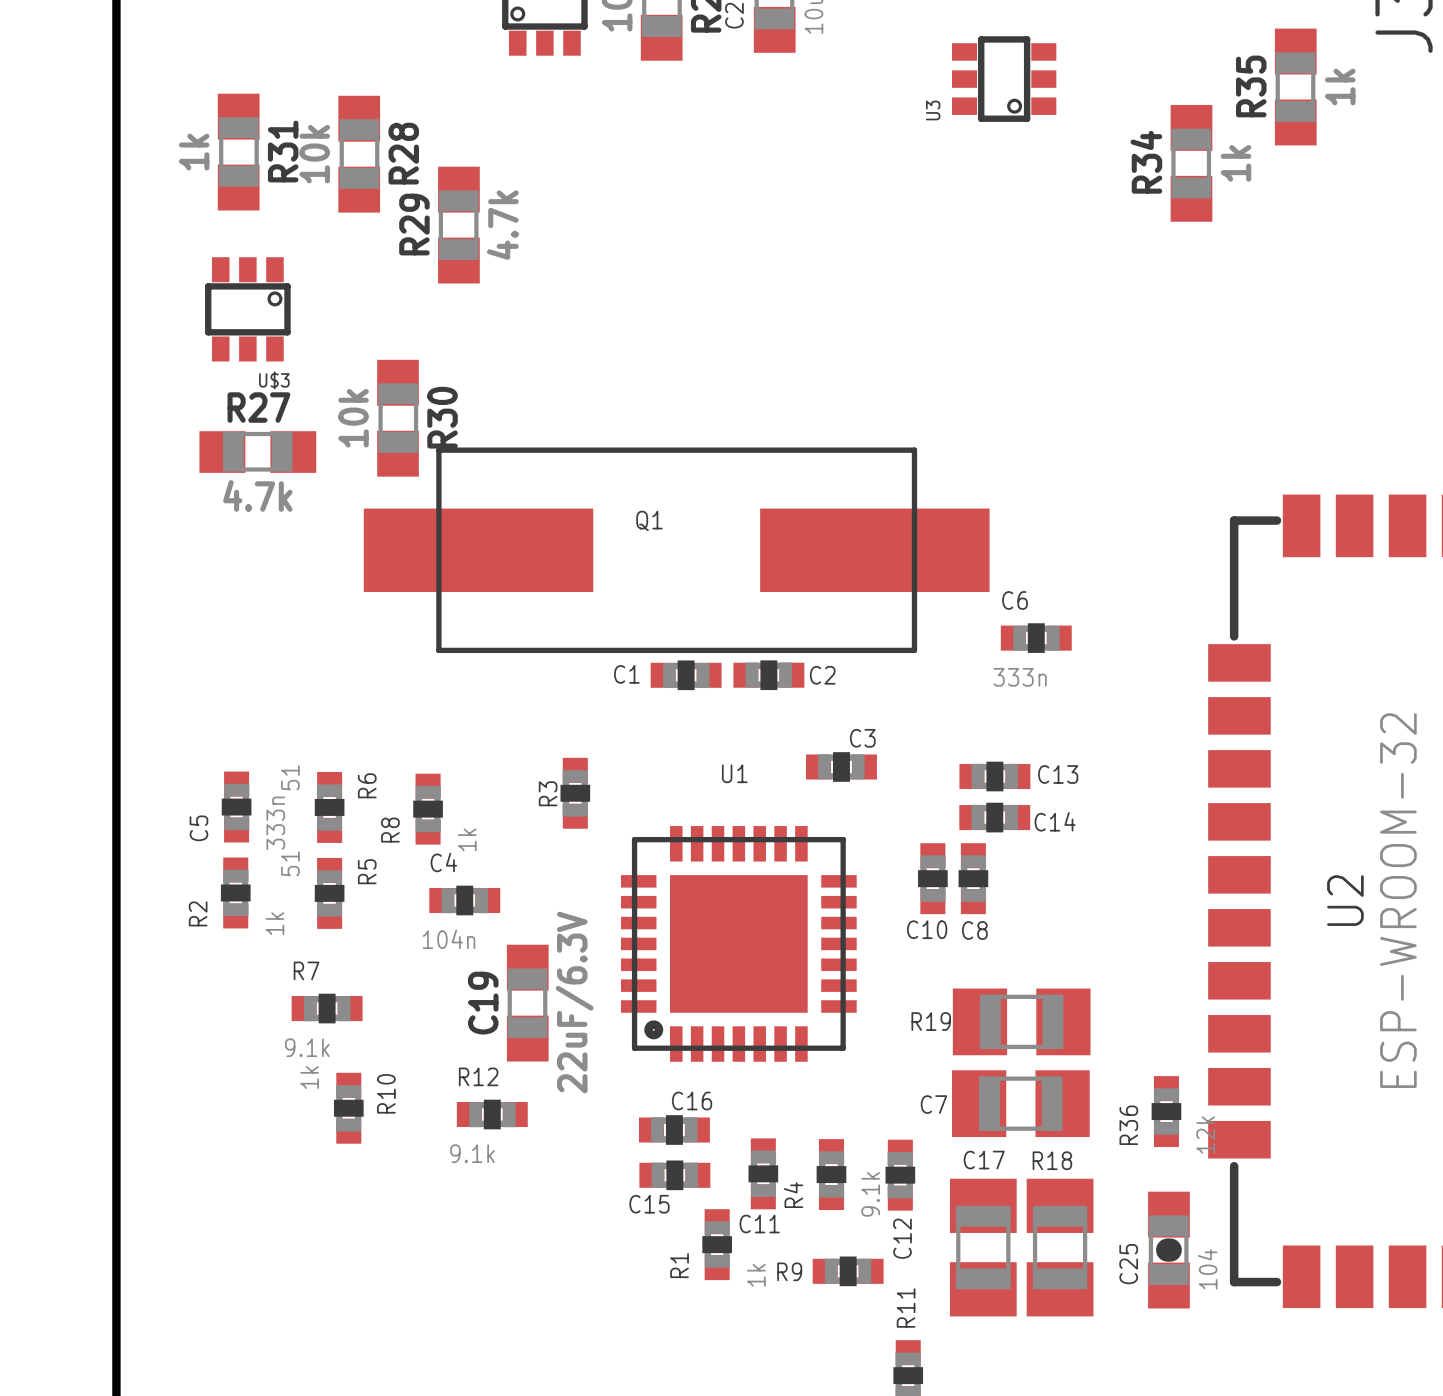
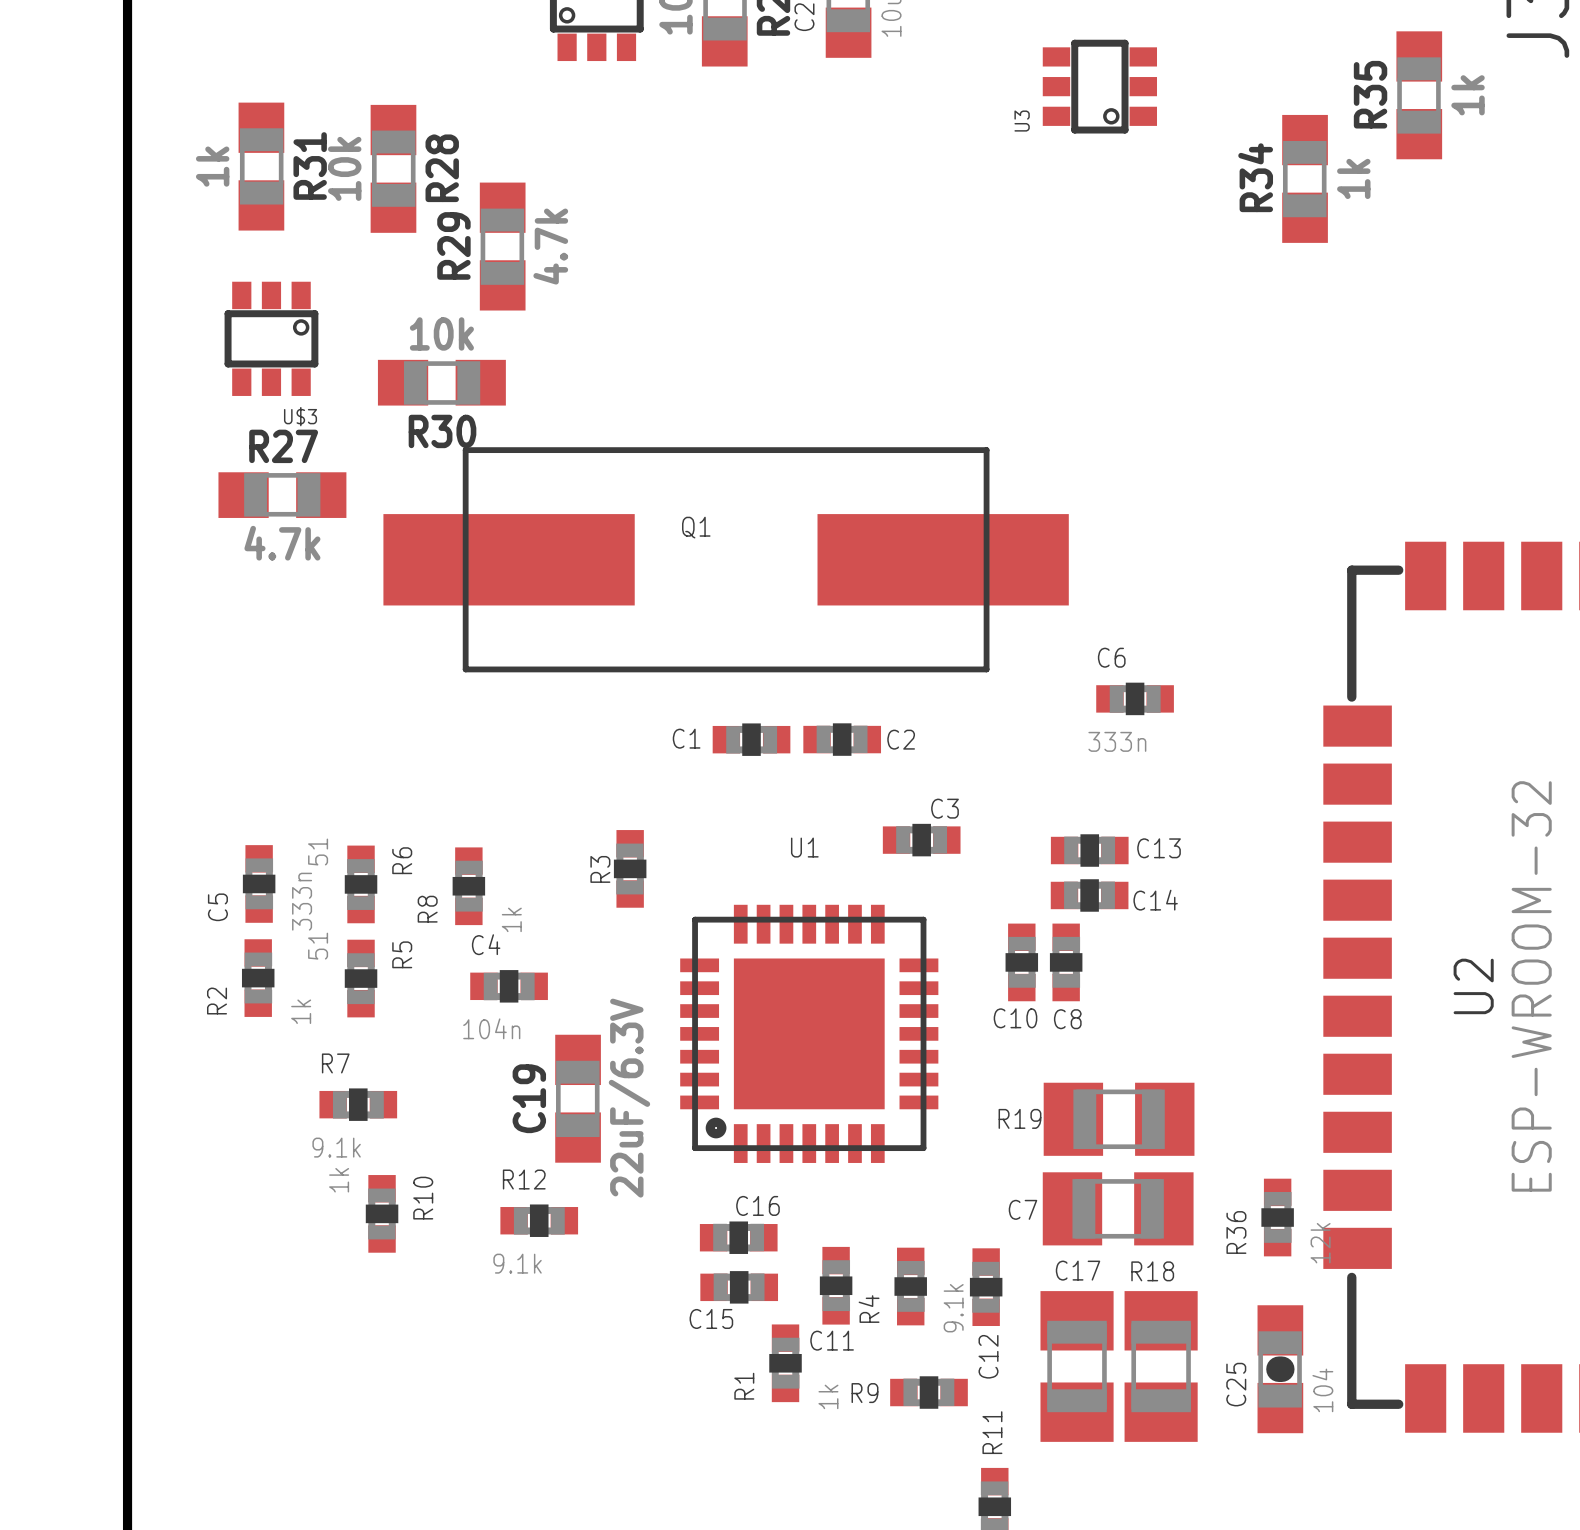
R30 rotation: 0° (398, 418) -> 90° clockwise (441, 382)
Q1 position: (676, 550) -> (726, 559)

